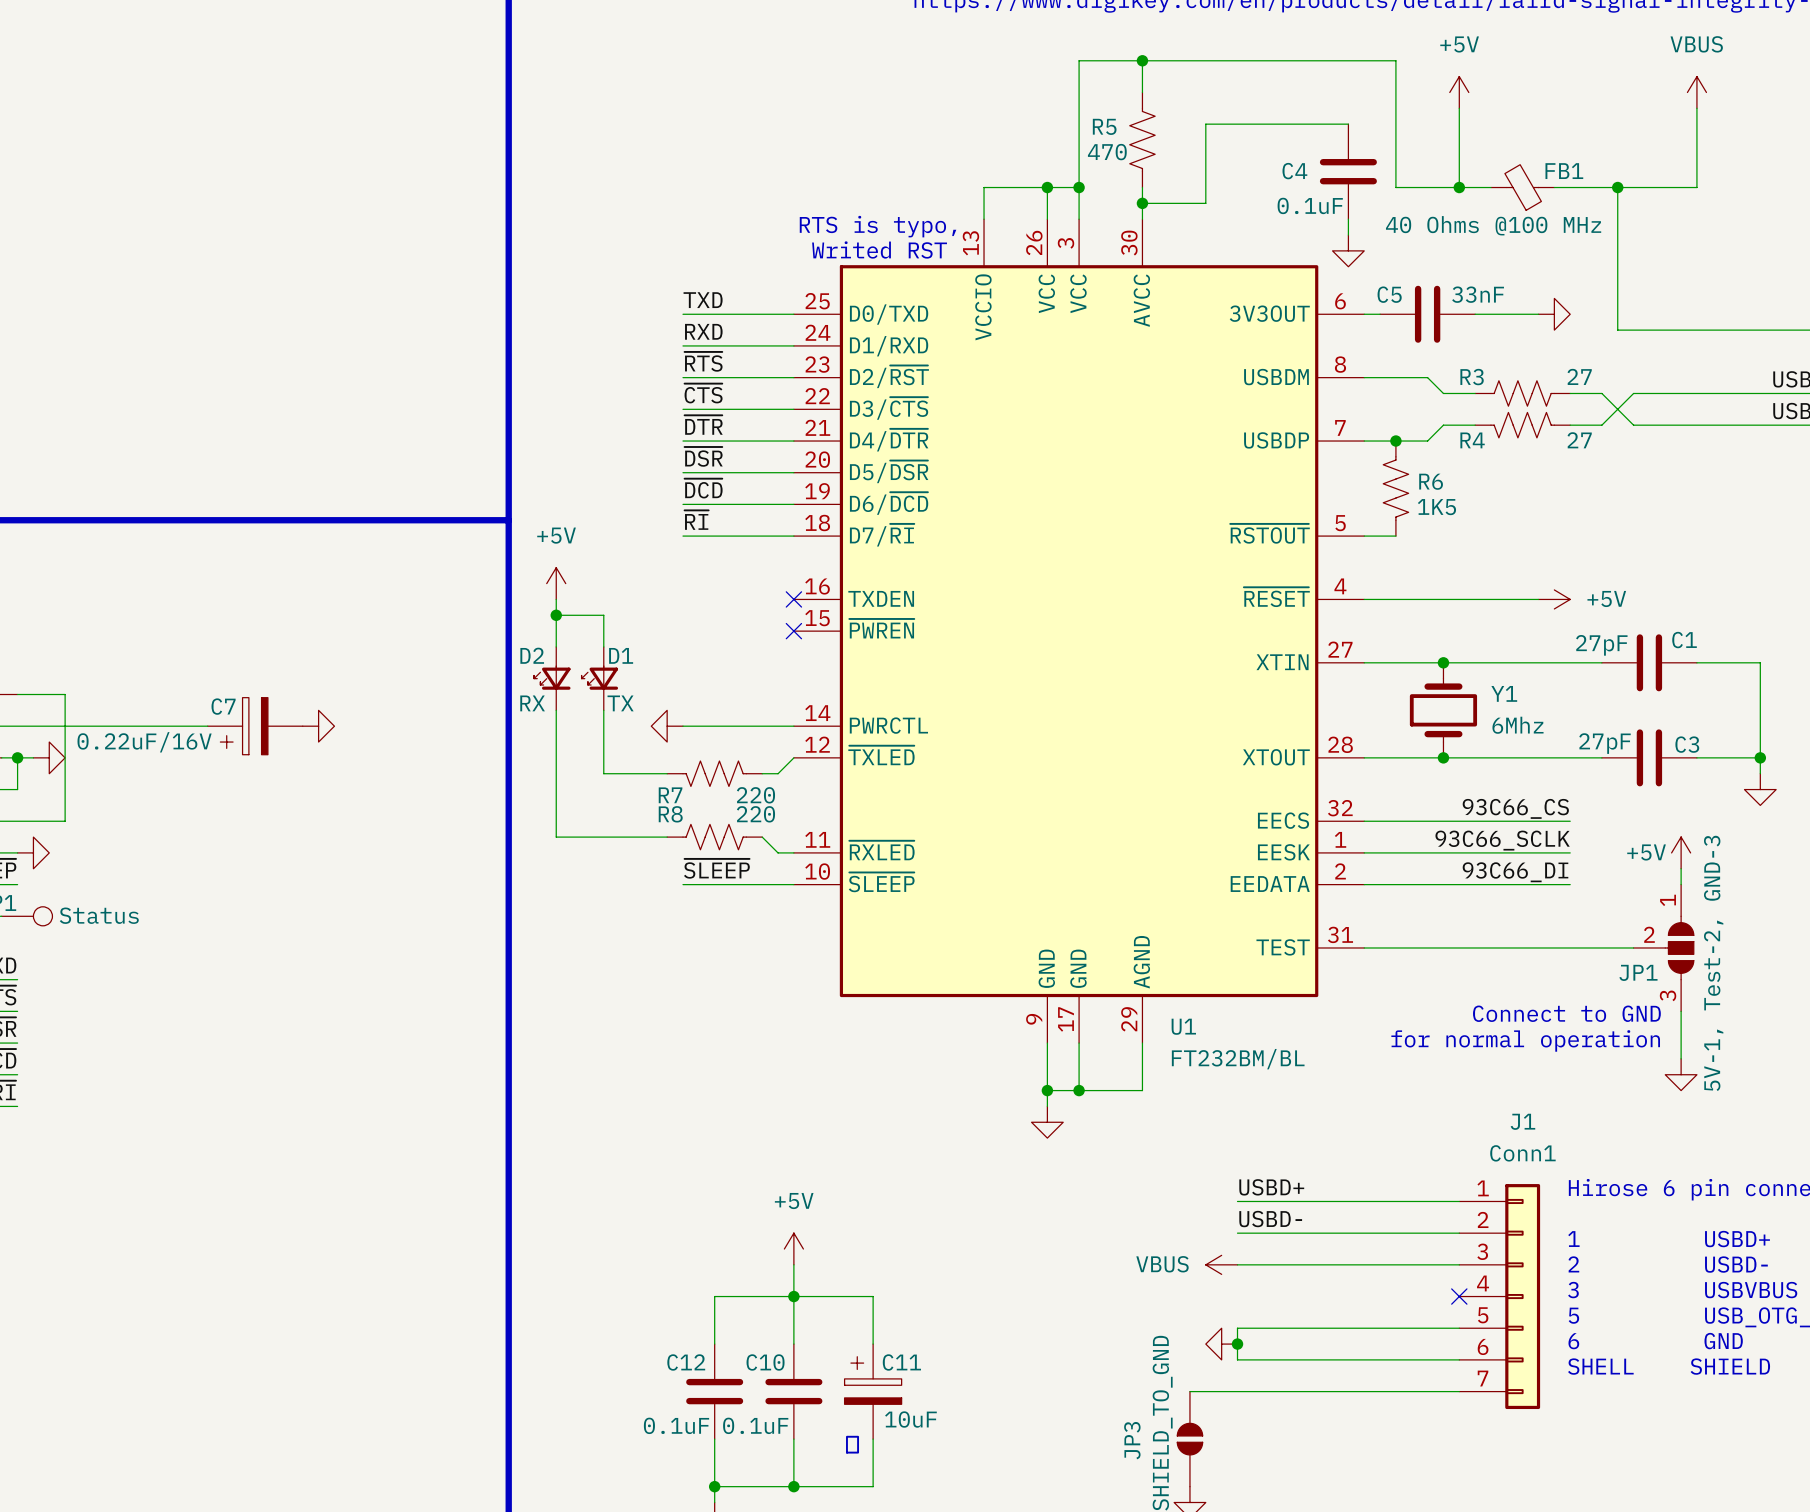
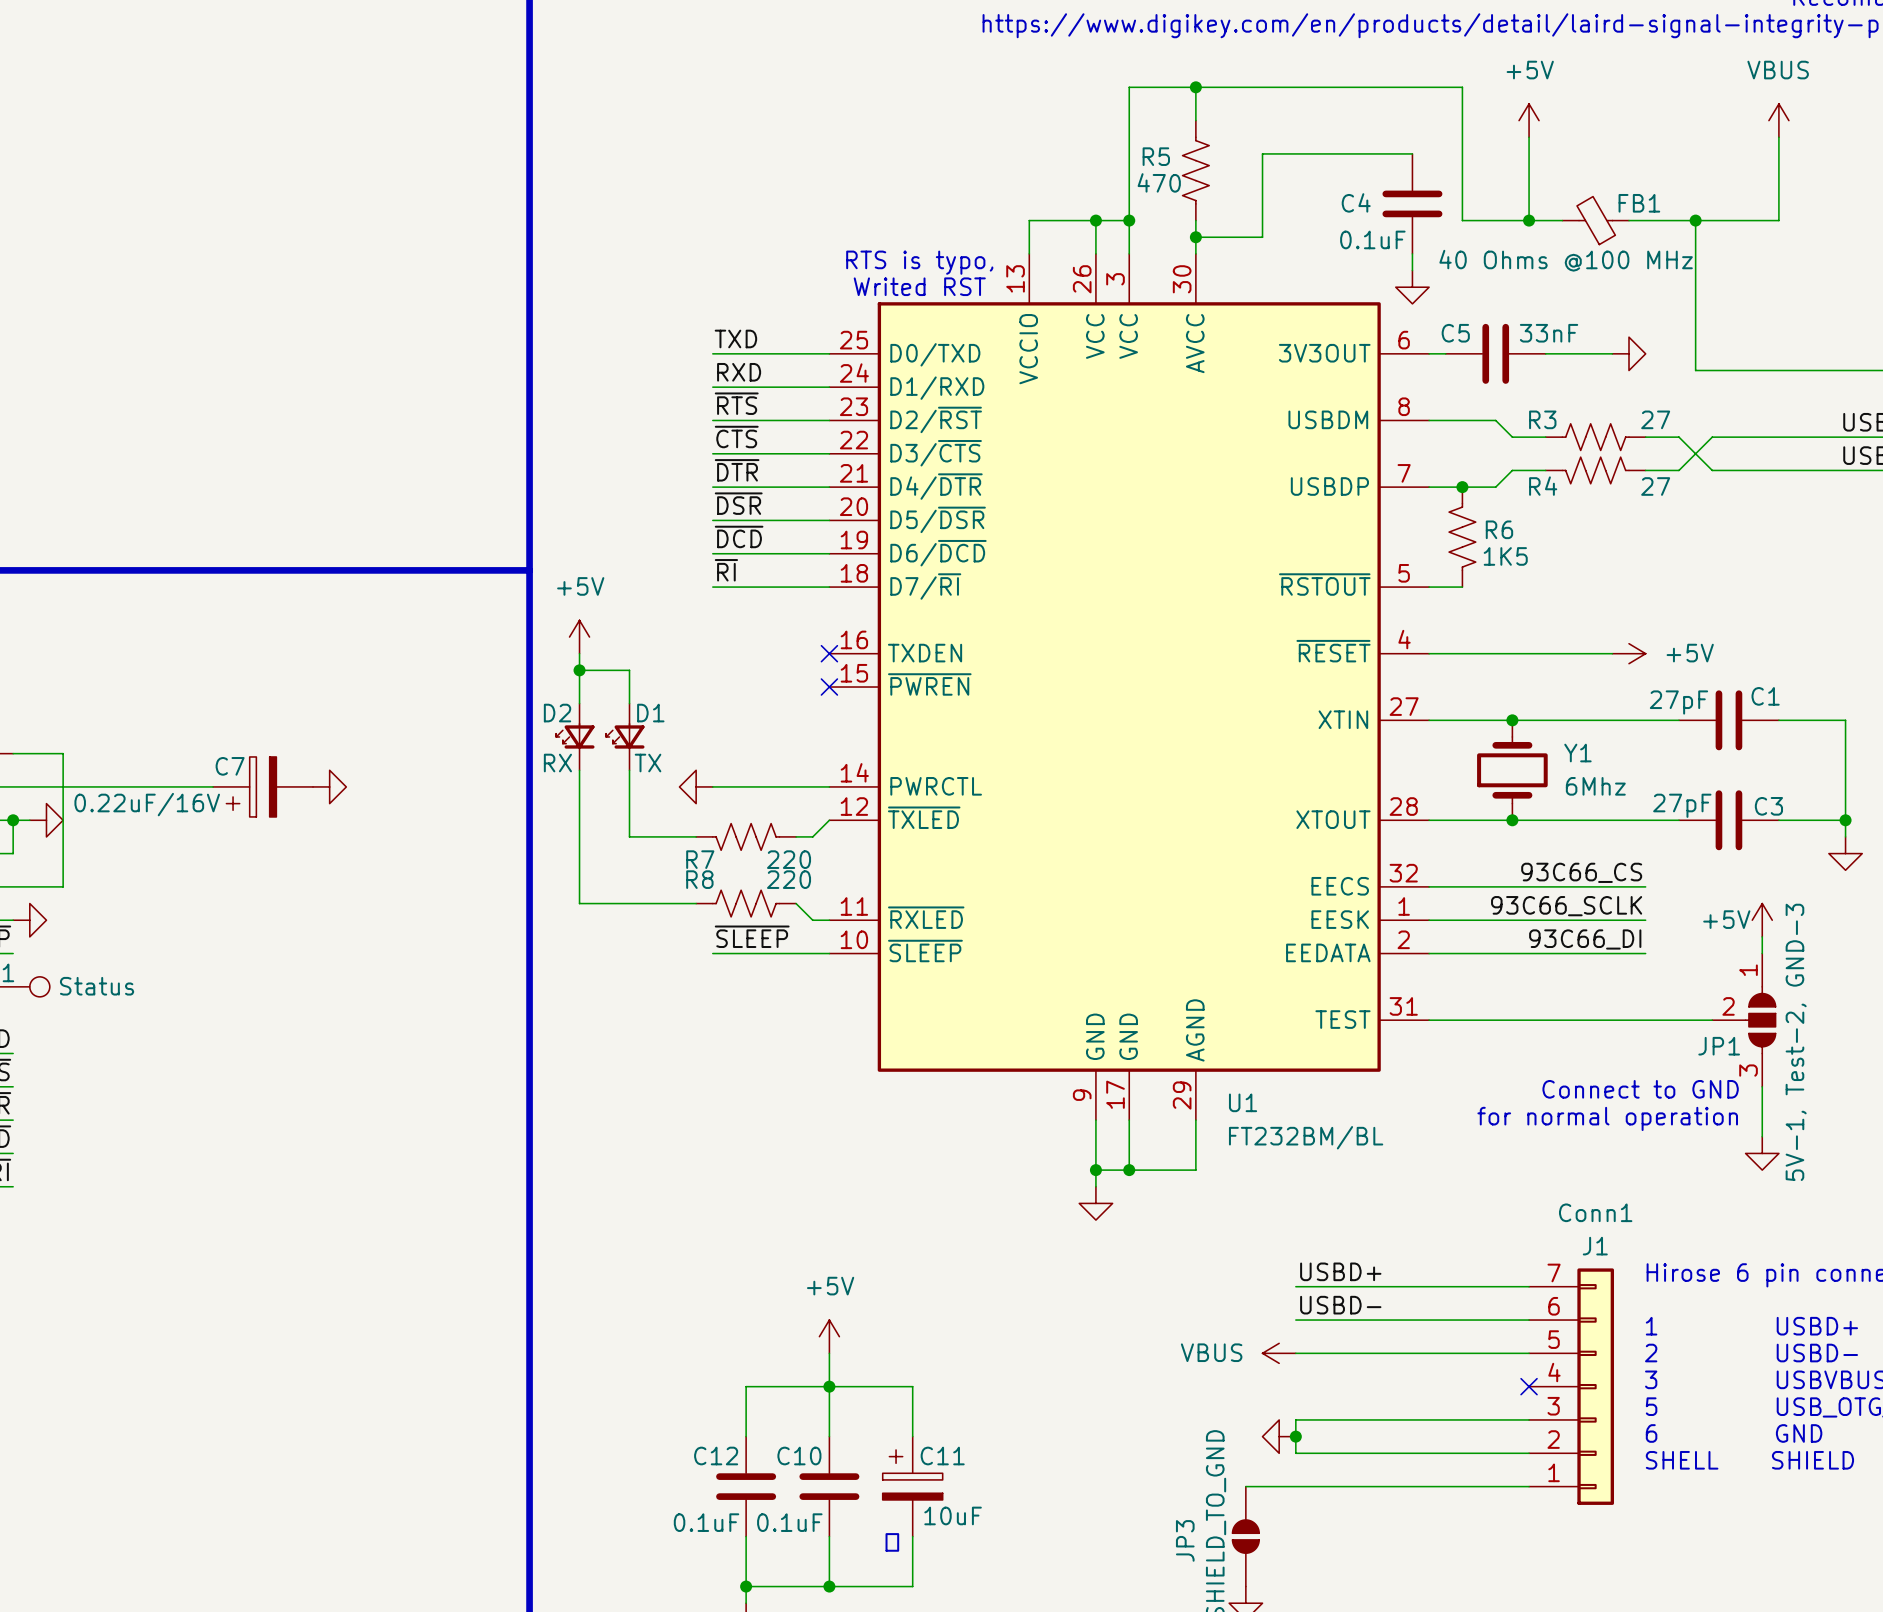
J1 name position: J1 (1522, 1121) -> J1 (1595, 1246)
J1 flip: as is (1522, 1296) -> up-down (1595, 1386)

